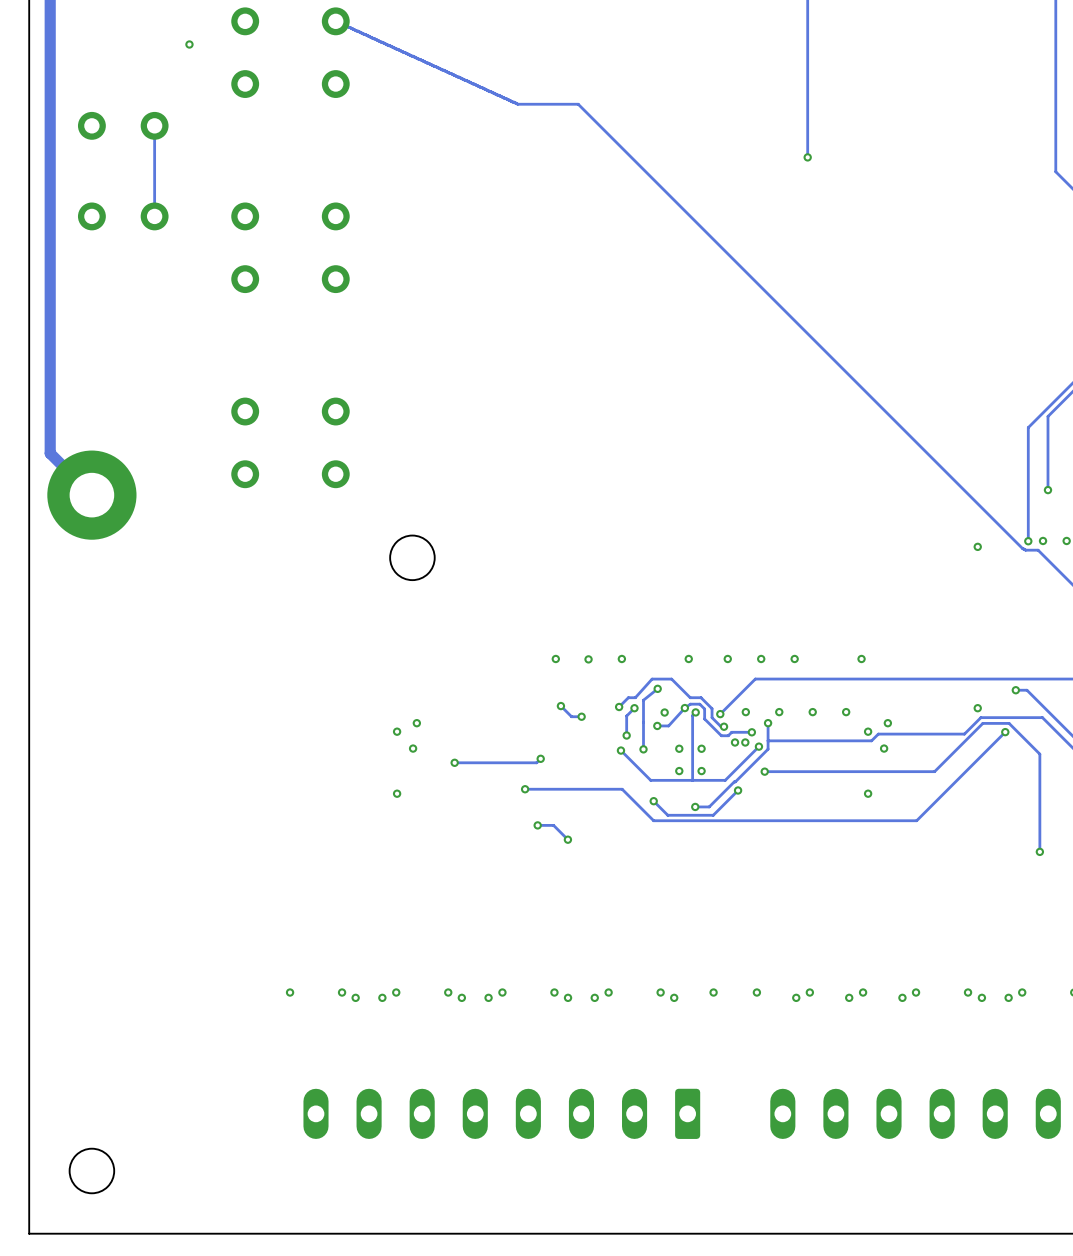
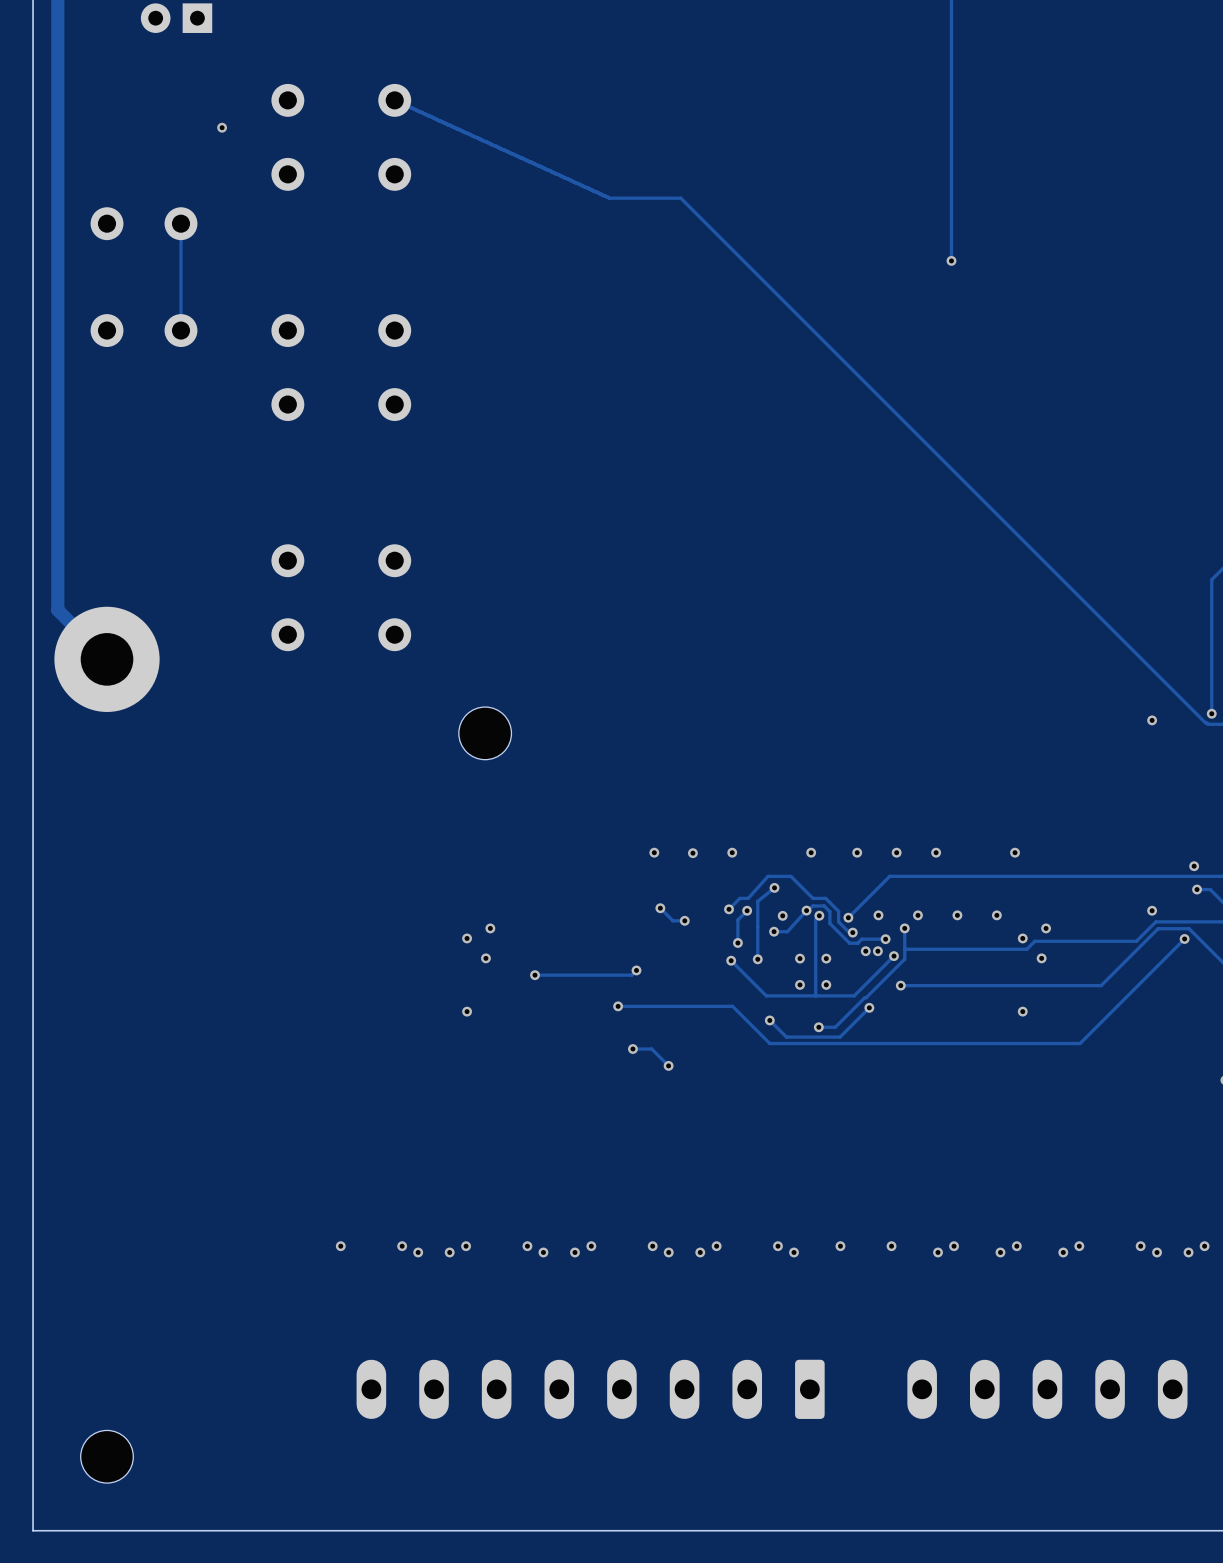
via: none -> (1194, 866)

